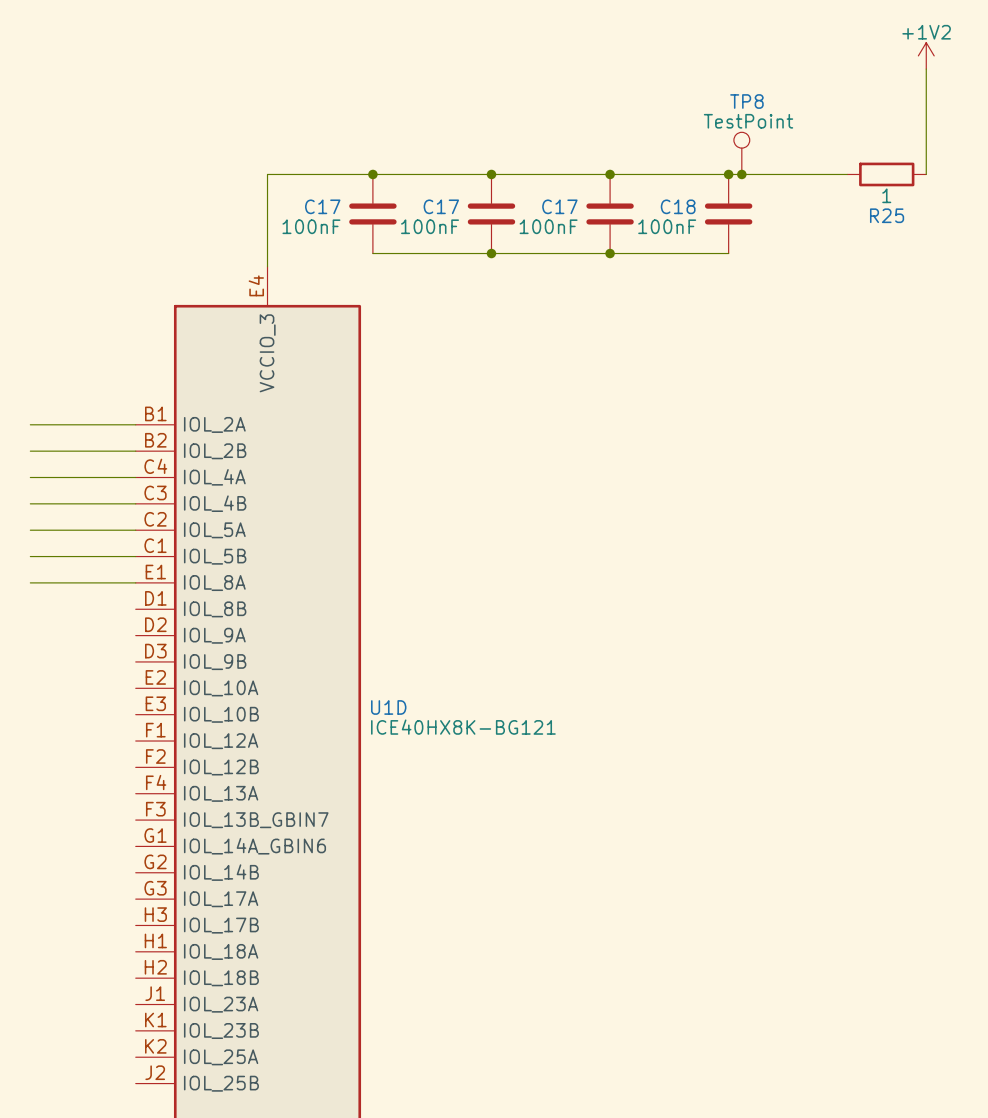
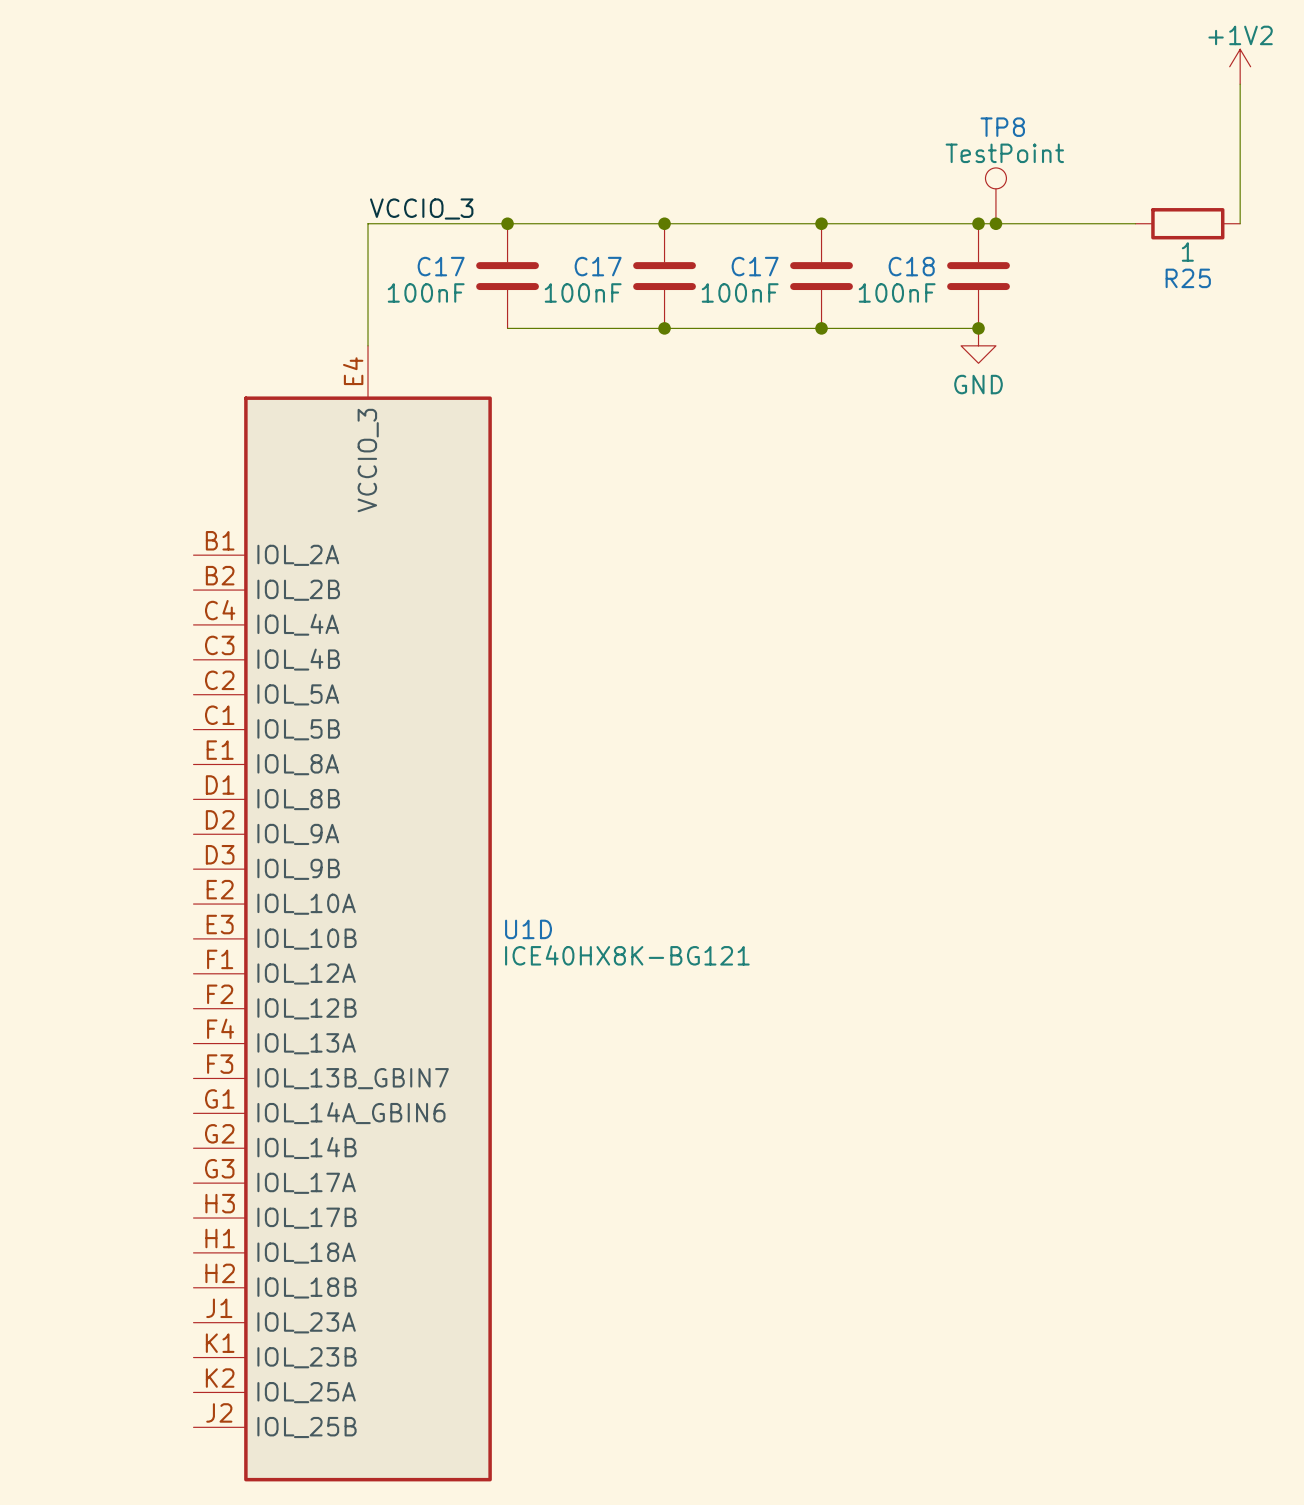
label: none -> VCCIO_3 (421, 209)
junction: none -> (978, 328)
power symbol: none -> GND (978, 345)
wire: (30, 424) (135, 424) -> none
wire: (30, 451) (135, 451) -> none
wire: (30, 477) (135, 477) -> none
wire: (30, 503) (135, 503) -> none
wire: (30, 530) (135, 530) -> none
wire: (30, 556) (135, 556) -> none
wire: (30, 582) (135, 582) -> none

